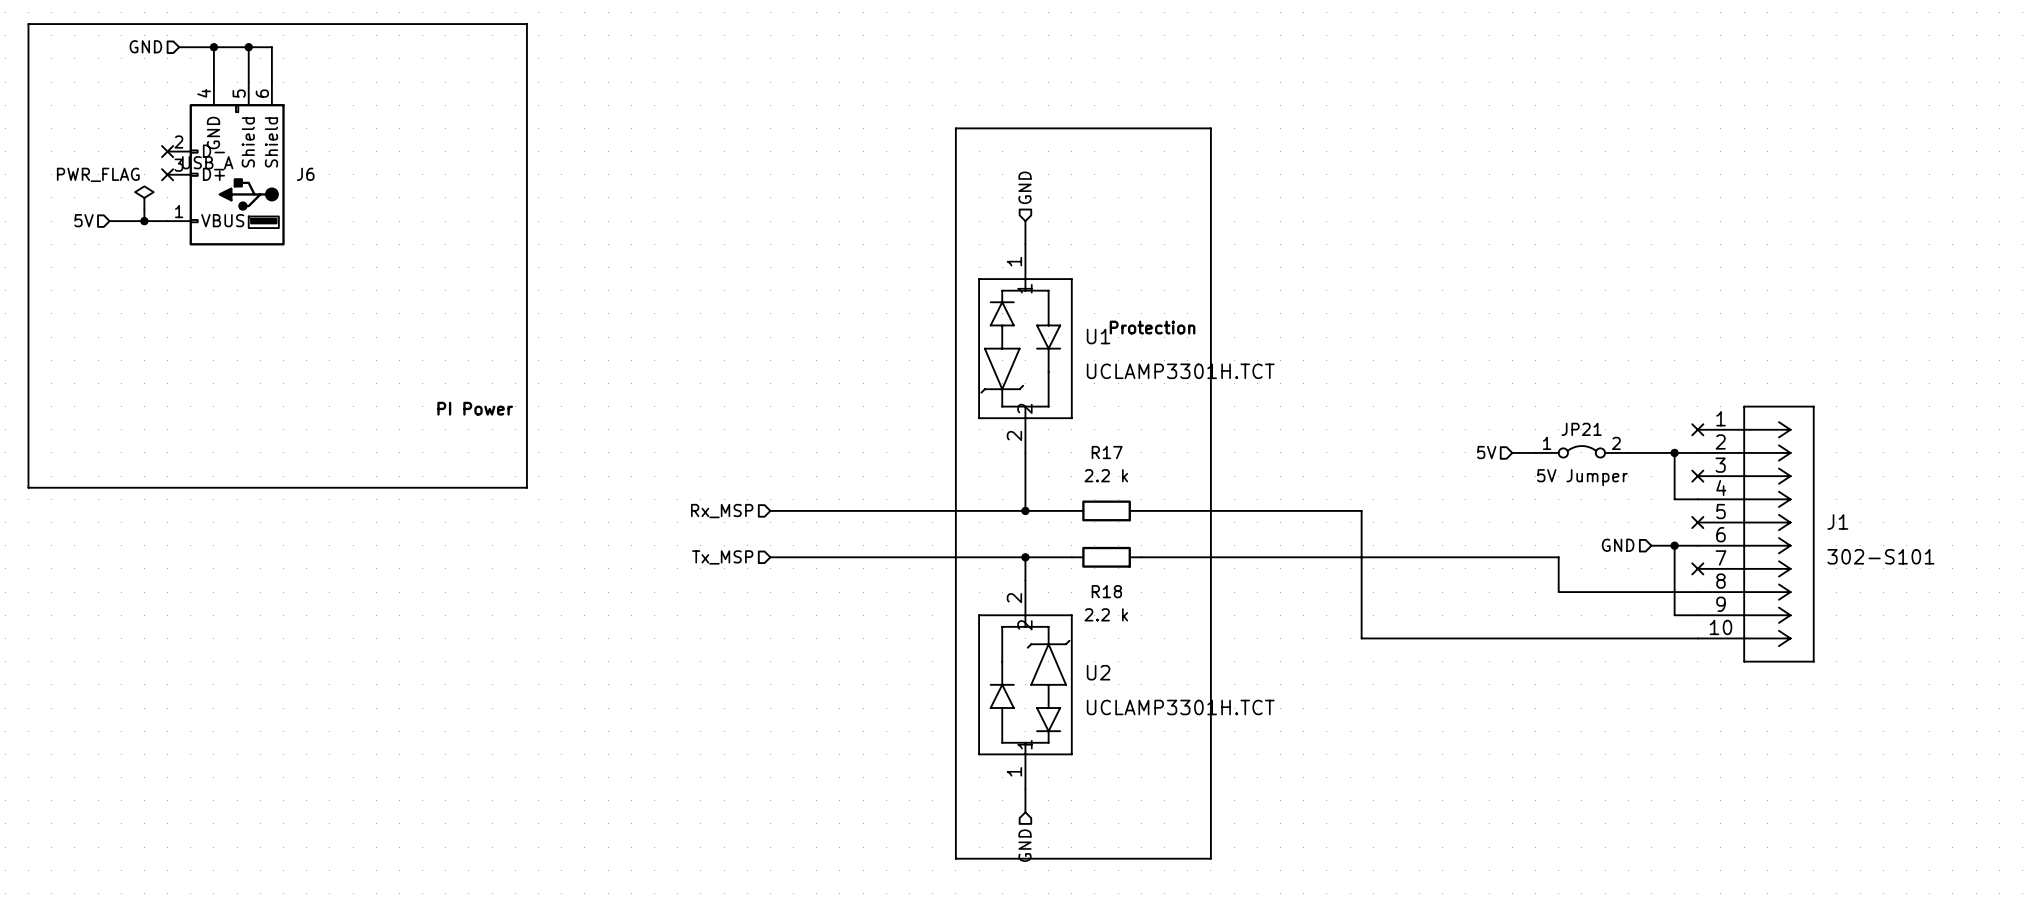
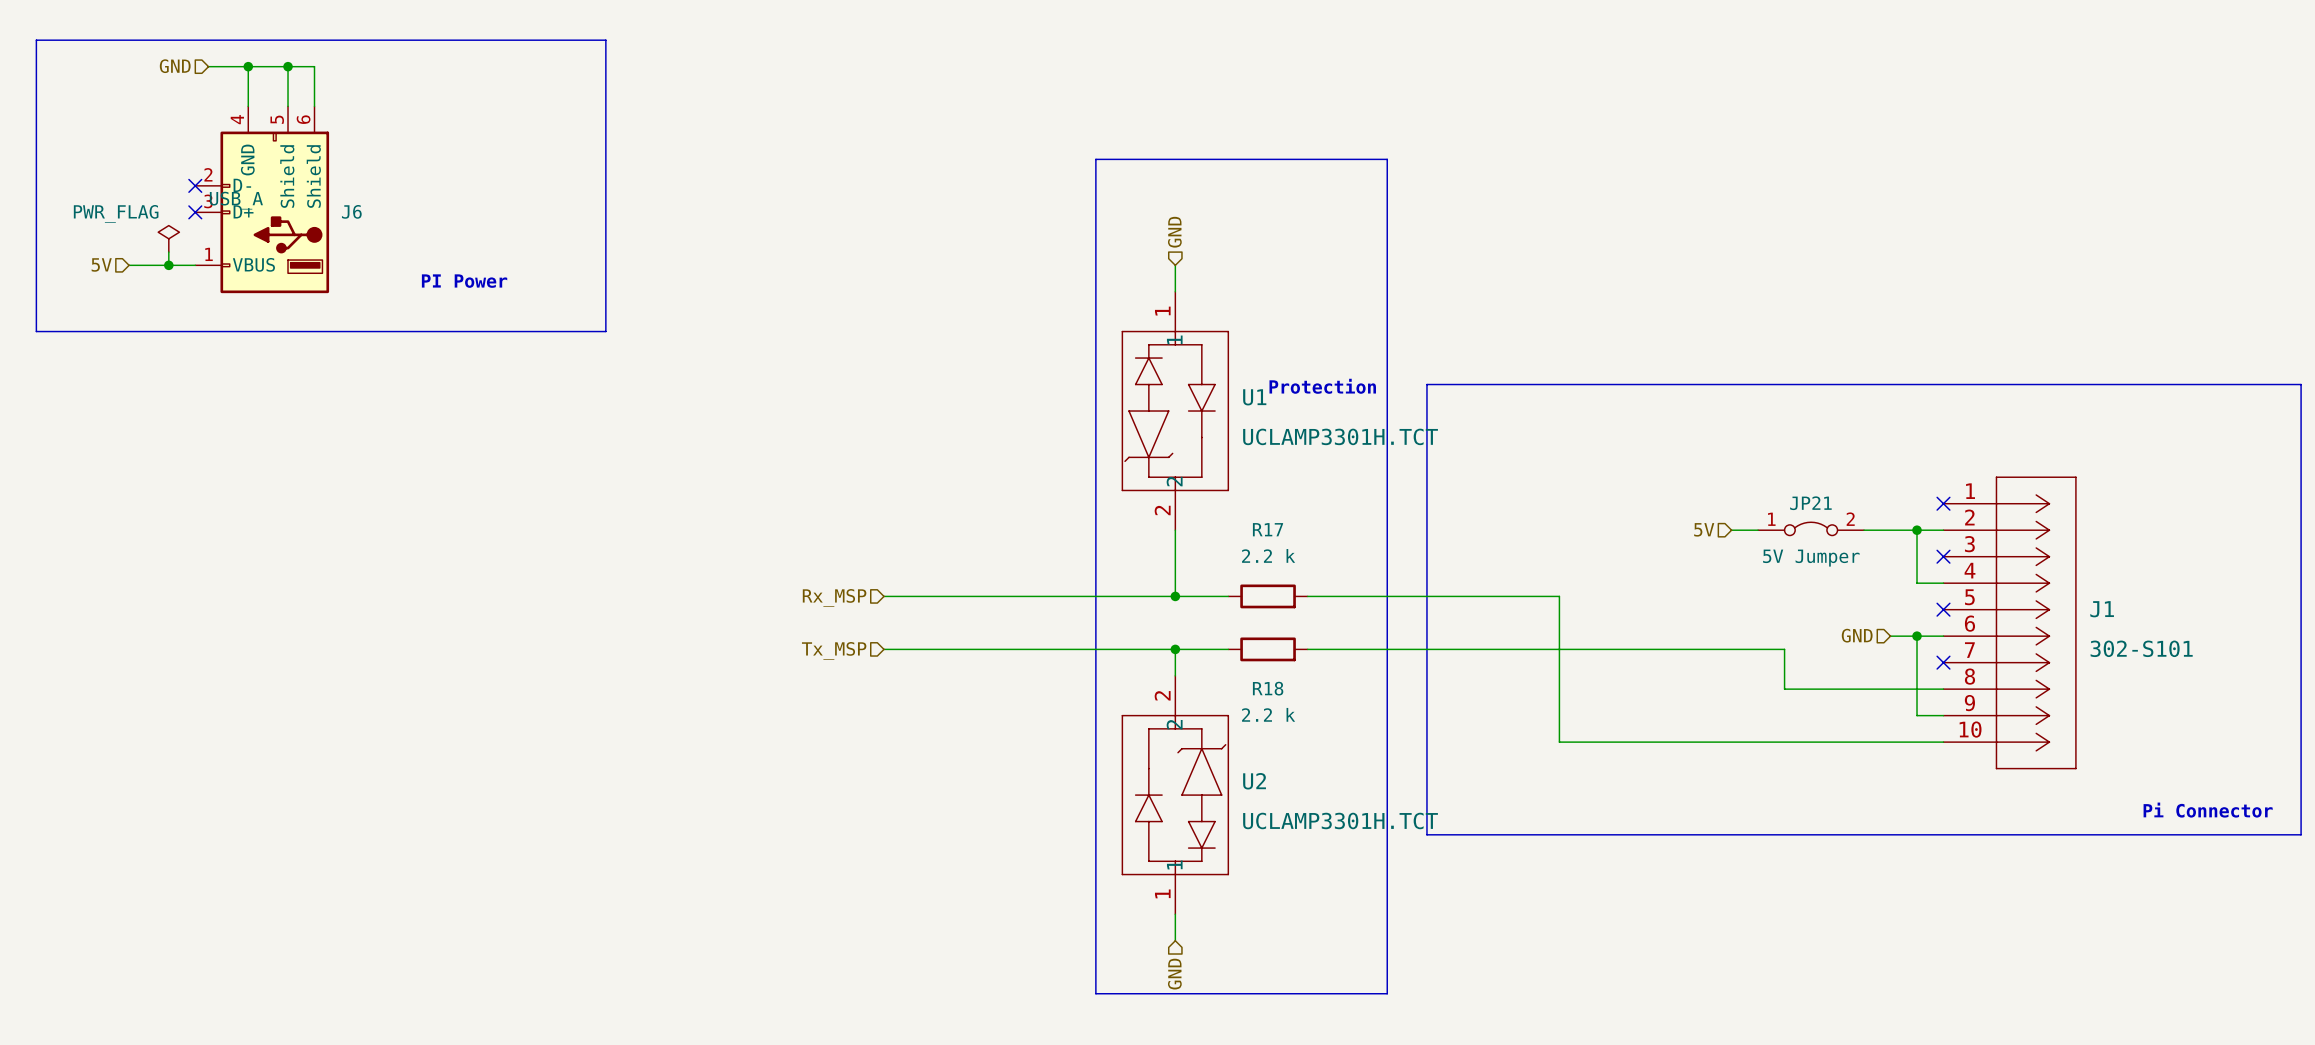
line: (28, 279) (28, 487) (526, 487) (526, 279) -> (36, 331) (605, 331)
line: none -> (1426, 384) (1426, 834) (2301, 834) (2301, 384) (1426, 384)
text position: PI Power (475, 408) -> PI Power (464, 281)
text: none -> Pi Connector (2208, 810)

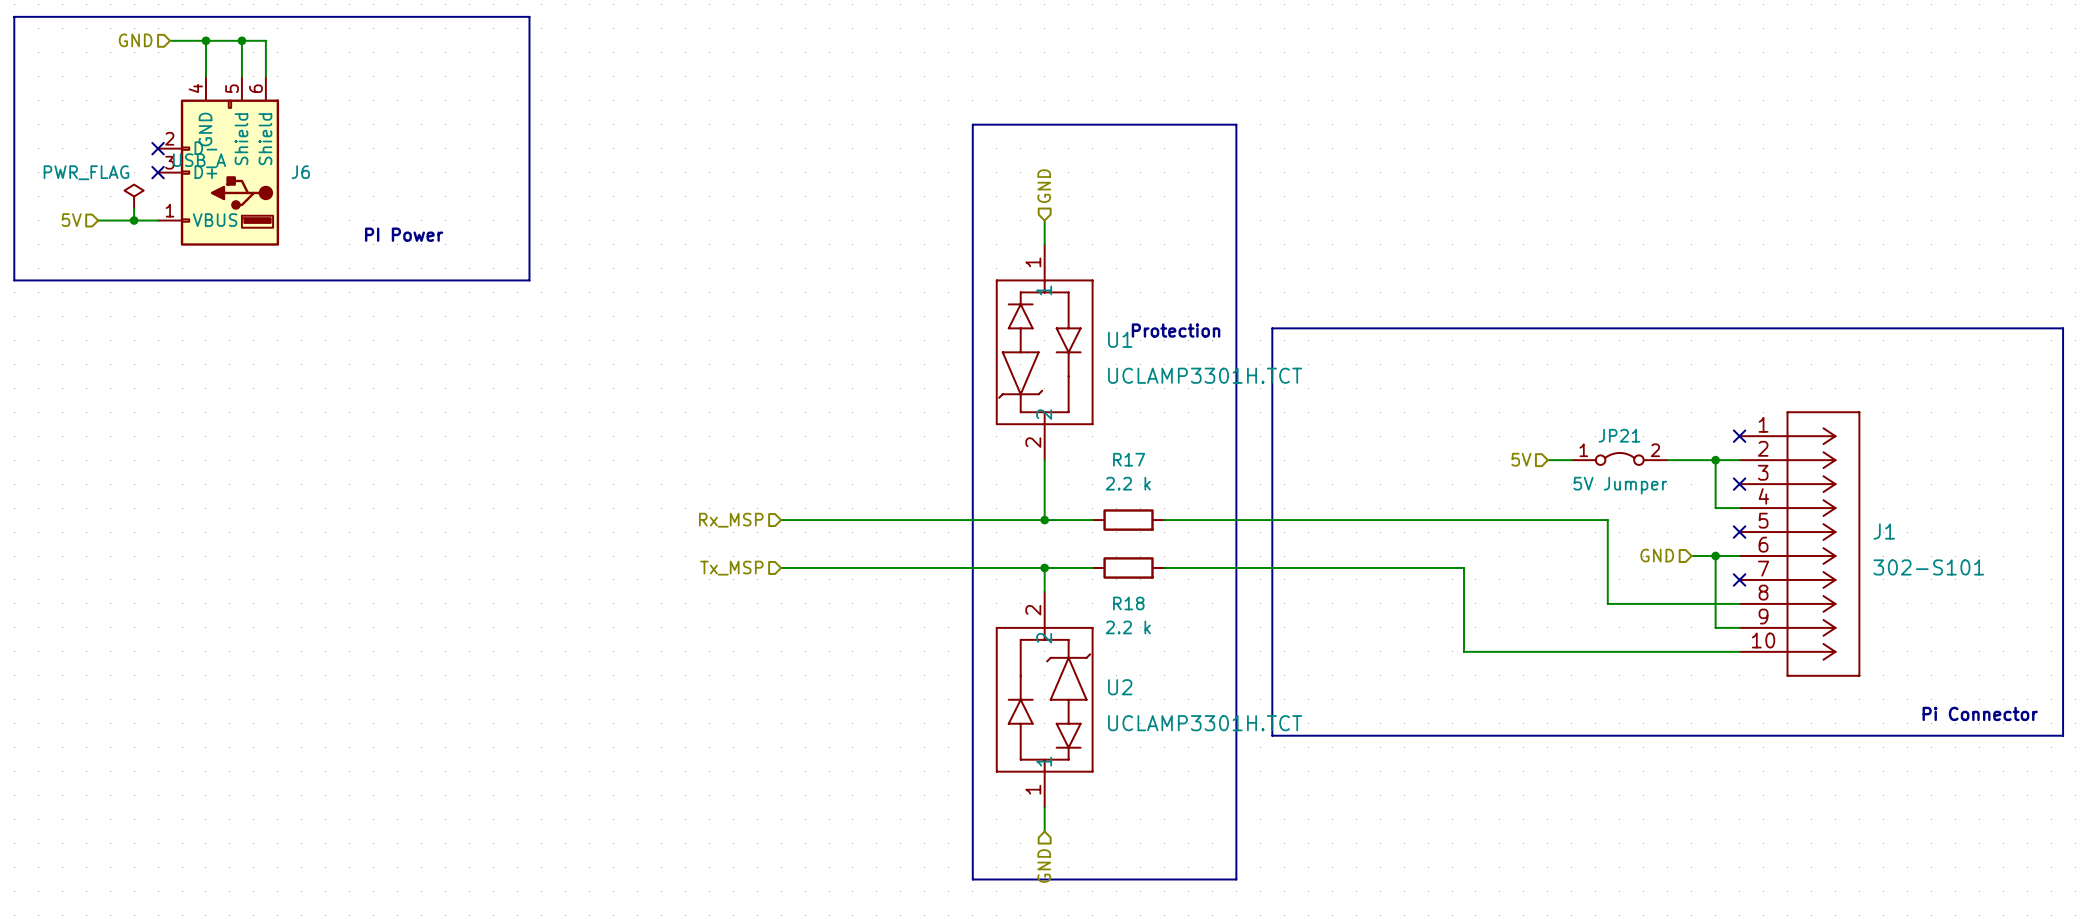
wire: (1559, 596) (1559, 742) (1638, 742) -> (1464, 567) (1464, 651)
wire: (1638, 649) (1784, 649) (1784, 689) (1797, 689) -> (1392, 520) (1607, 520) (1607, 603)

